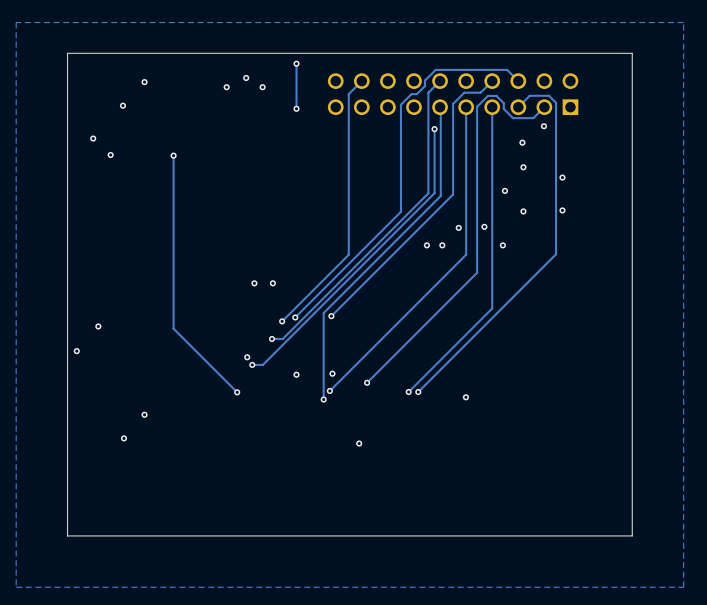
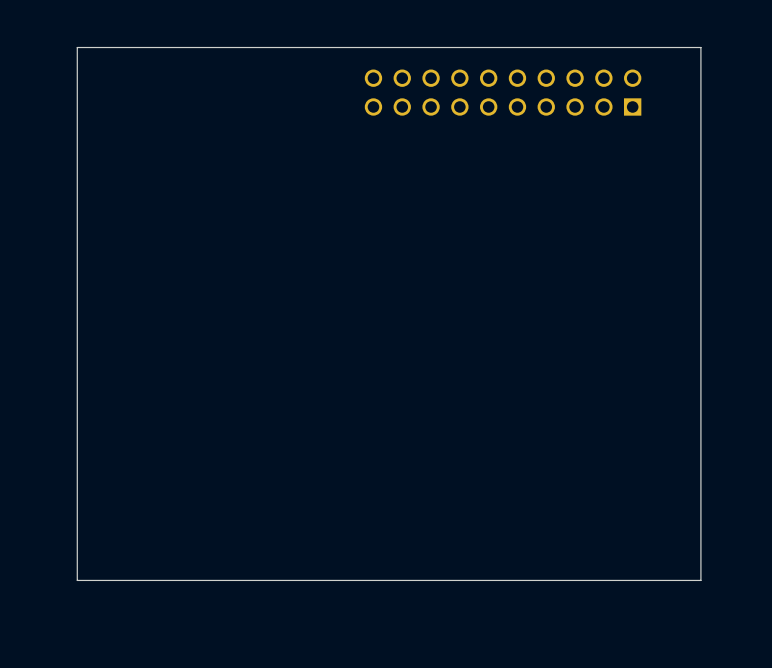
zone outline: (683, 22) (16, 22) (16, 587) (683, 587) (683, 22) -> none
track: (296, 63) (296, 108) -> none
via: (296, 63) -> none
via: (246, 77) -> none
track: (361, 81) (348, 94) (348, 254) (282, 321) -> none
track: (440, 81) (428, 92) (428, 193) (282, 338) (271, 338) -> none
track: (492, 81) (480, 92) (464, 92) (453, 103) (453, 194) (331, 316) -> none
track: (518, 81) (507, 69) (435, 69) (424, 80) (424, 86) (416, 94) (411, 94) (400, 104) (400, 211) (295, 317) -> none
via: (144, 82) -> none
via: (226, 87) -> none
via: (262, 87) -> none
via: (122, 105) -> none
track: (440, 107) (440, 195) (323, 313) (323, 399) -> none
track: (466, 107) (466, 254) (329, 390) -> none
track: (492, 107) (492, 308) (408, 392) -> none
track: (518, 107) (529, 95) (549, 95) (556, 102) (556, 254) (418, 392) -> none
track: (544, 107) (533, 118) (513, 118) (503, 108) (503, 103) (496, 95) (487, 95) (477, 106) (477, 272) (367, 382) -> none
via: (296, 108) -> none
via: (543, 126) -> none
track: (434, 129) (434, 193) (262, 364) (252, 364) -> none
via: (434, 129) -> none
via: (93, 138) -> none
via: (522, 142) -> none
via: (110, 154) -> none
track: (173, 155) (173, 328) (237, 392) -> none
via: (173, 155) -> none
via: (523, 167) -> none
via: (562, 177) -> none
via: (504, 190) -> none
via: (562, 210) -> none
via: (523, 211) -> none
via: (484, 226) -> none
via: (458, 227) -> none
via: (426, 245) -> none
via: (442, 245) -> none
via: (502, 245) -> none
via: (254, 283) -> none
via: (272, 283) -> none
via: (331, 316) -> none
via: (295, 317) -> none
via: (282, 321) -> none
via: (98, 326) -> none
via: (271, 338) -> none
via: (76, 351) -> none
via: (247, 357) -> none
via: (252, 364) -> none
via: (332, 373) -> none
via: (296, 374) -> none
via: (367, 382) -> none
via: (329, 390) -> none
via: (237, 392) -> none
via: (408, 392) -> none
via: (418, 392) -> none
via: (465, 397) -> none
via: (323, 399) -> none
via: (144, 414) -> none
via: (124, 438) -> none
via: (359, 443) -> none

